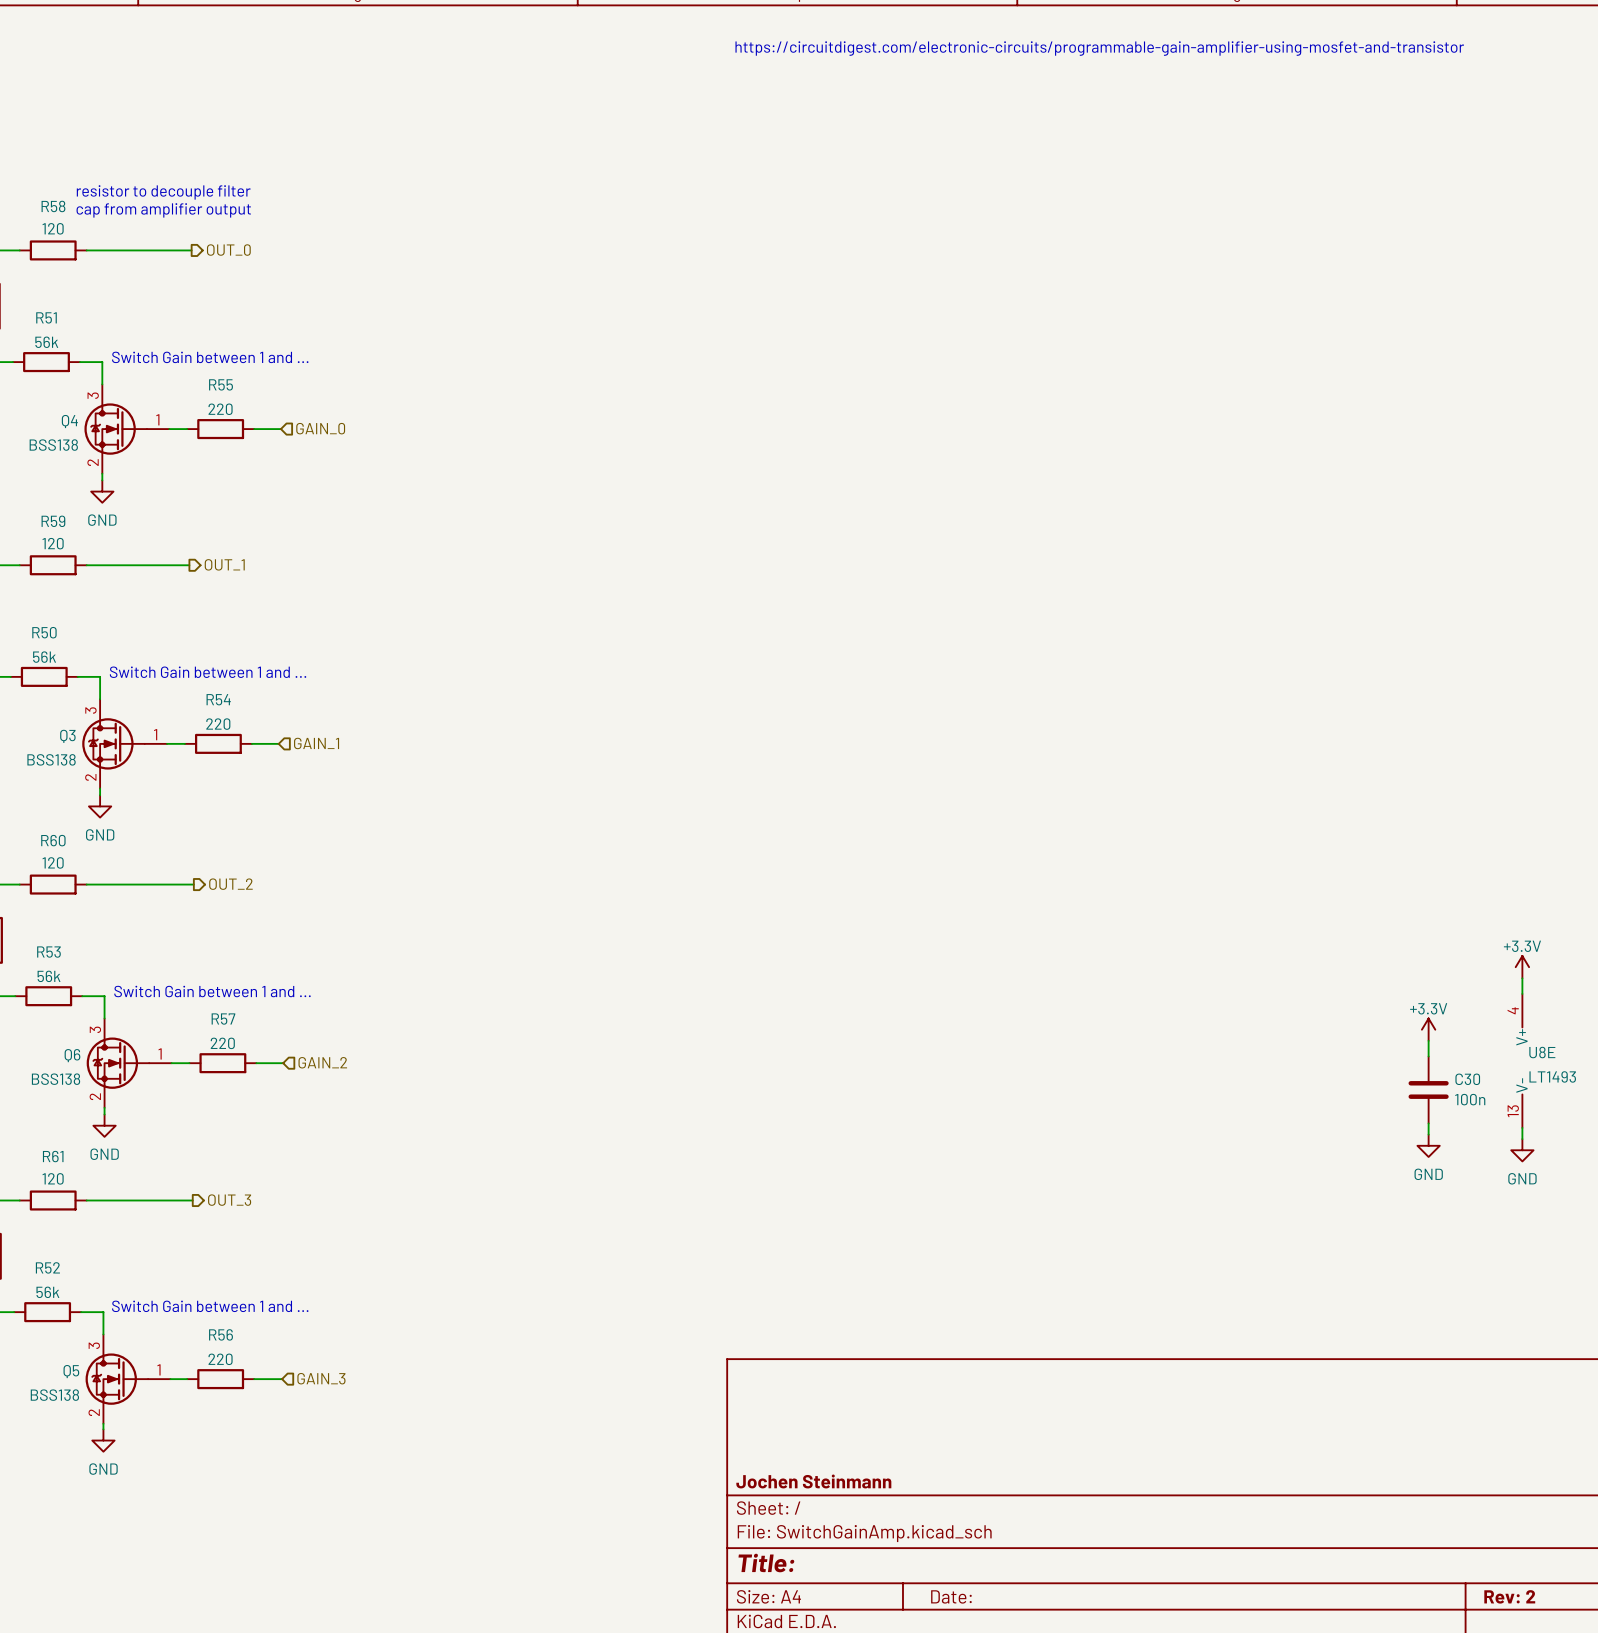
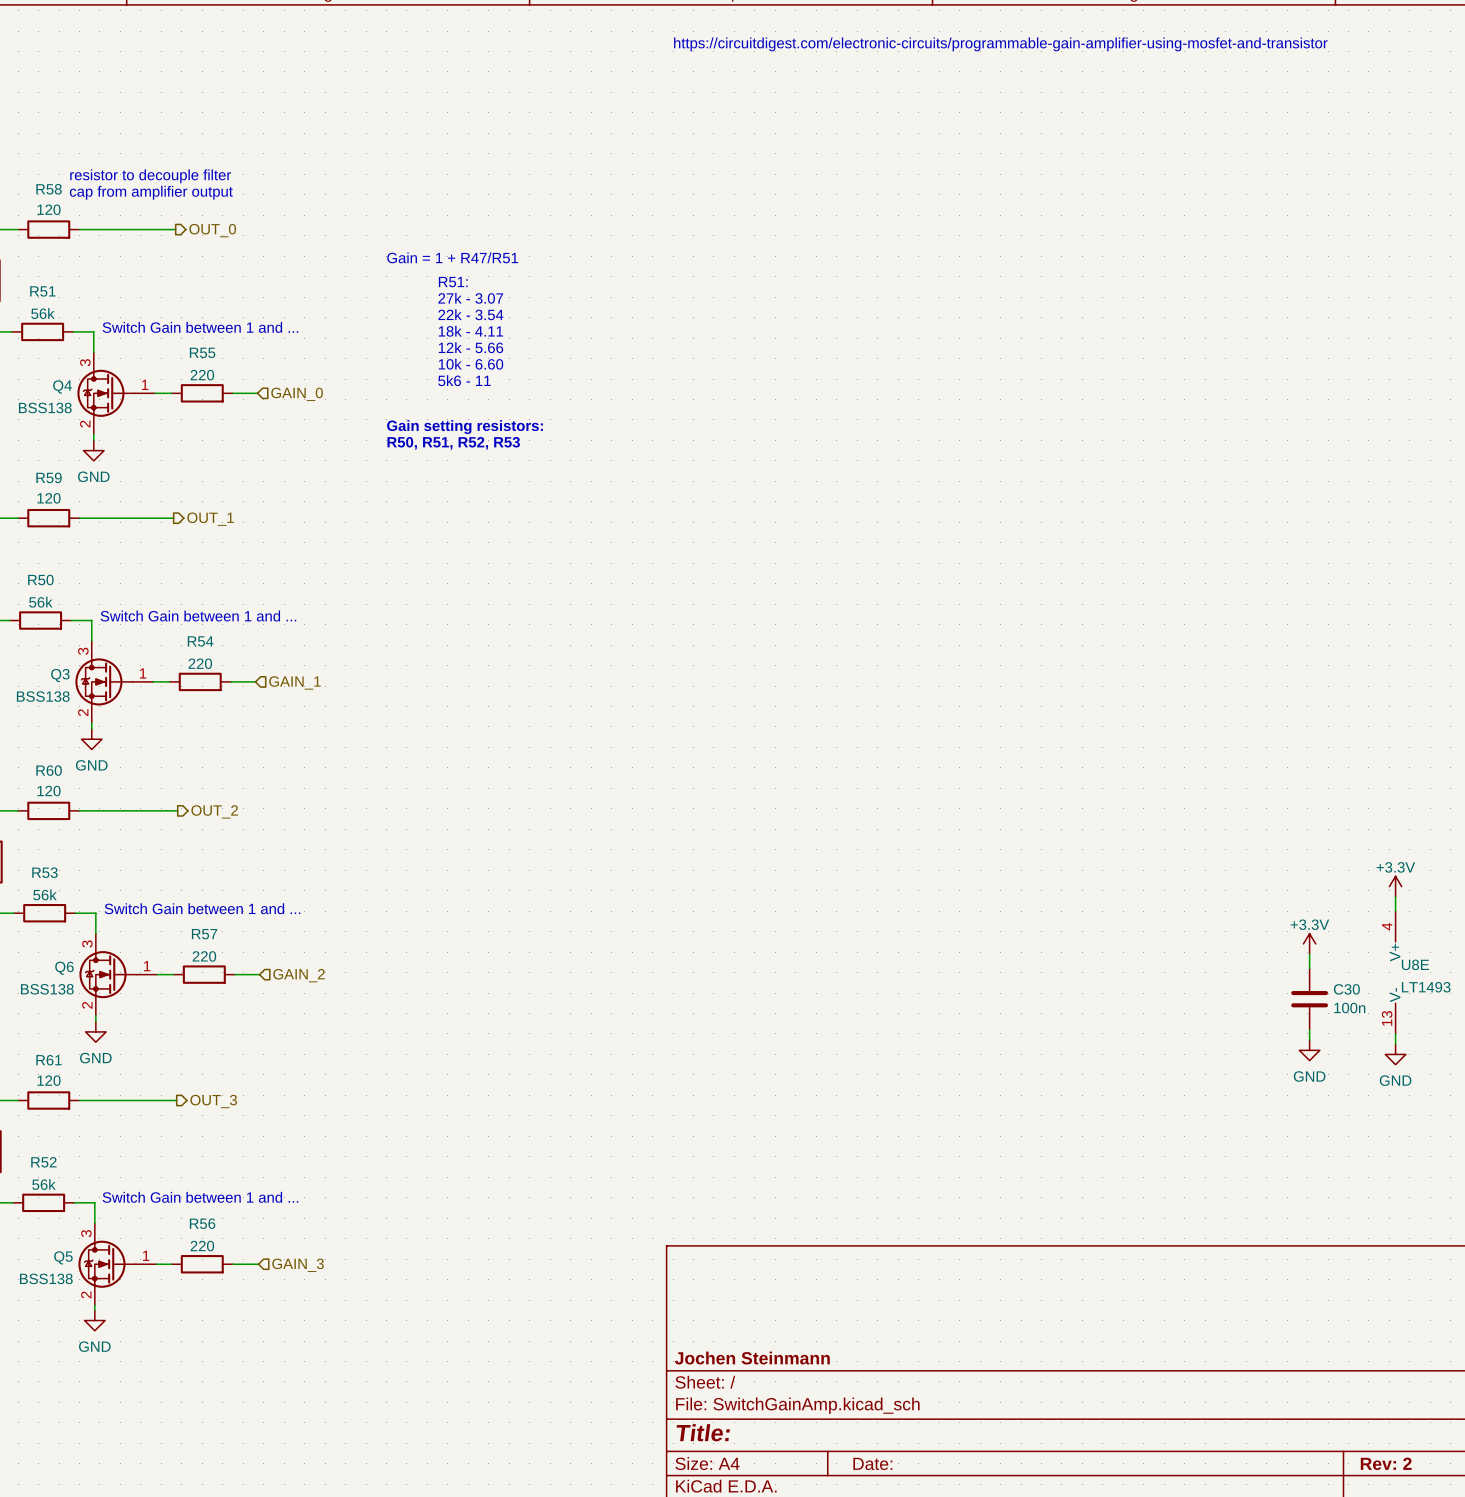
text: none -> Gain = 1 + R47/R51 (452, 257)
text: none -> R51: (453, 282)
text: none -> 27k - 3.07 (470, 298)
text: none -> 22k - 3.54 (470, 314)
text: none -> 18k - 4.11 (470, 331)
text: none -> 12k - 5.66 (470, 347)
text: none -> 10k - 6.60 (471, 364)
text: none -> 5k6 - 11 (464, 380)
text: none -> Gain setting resistors: (465, 427)
text: none -> R50, R51, R52, R53 (453, 443)

